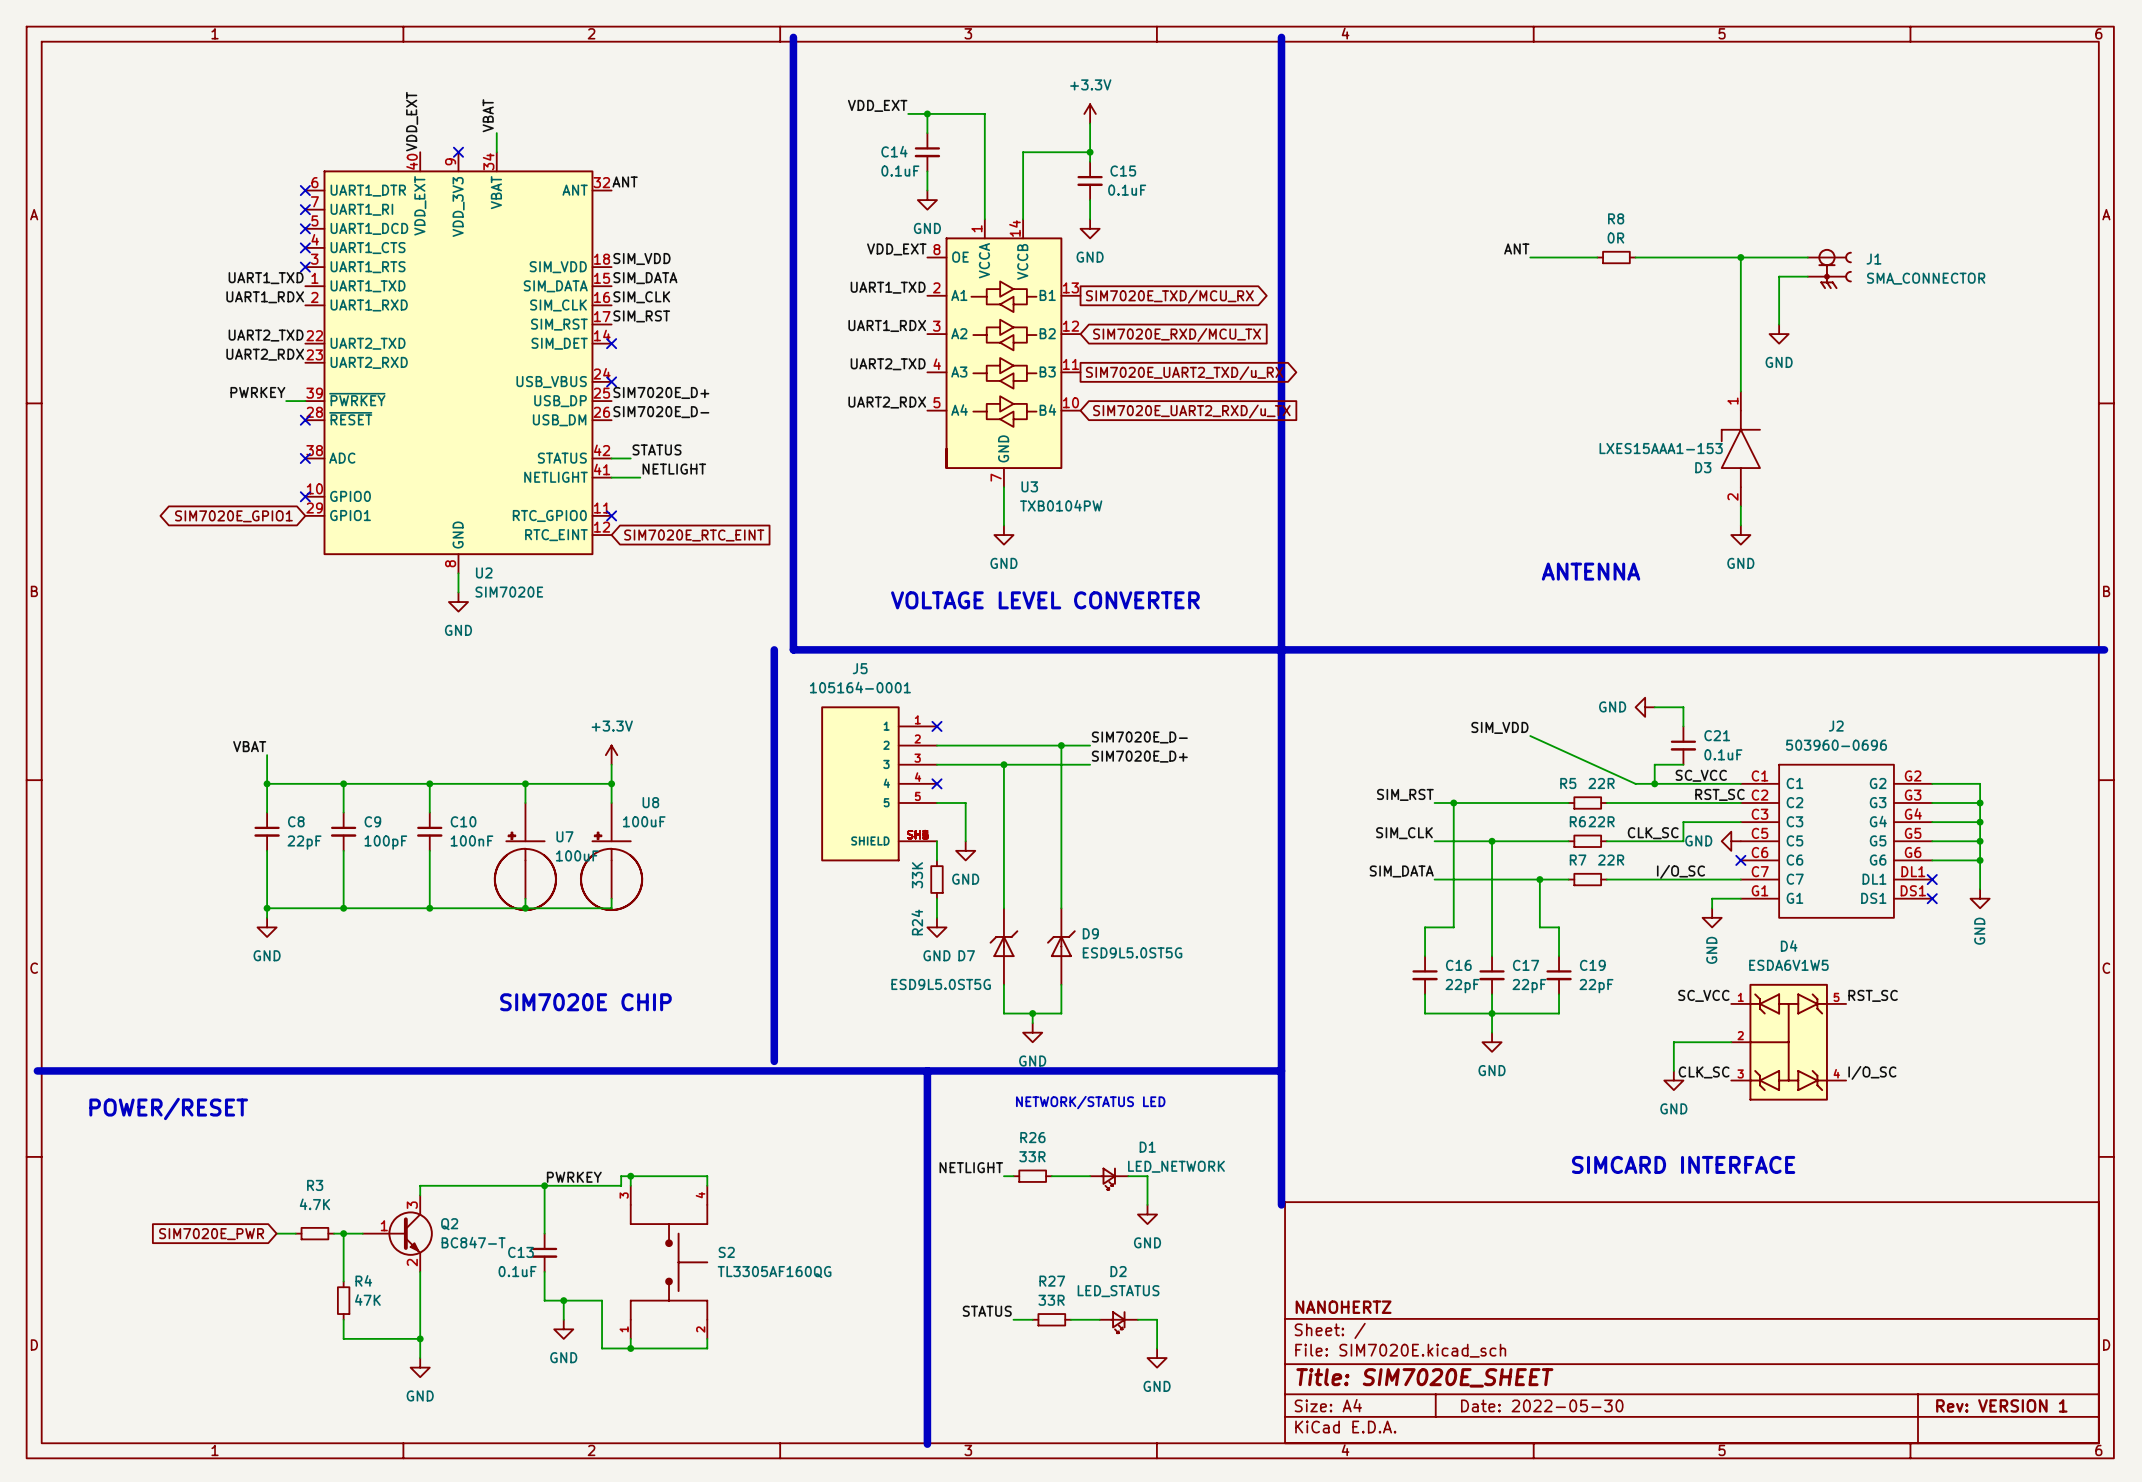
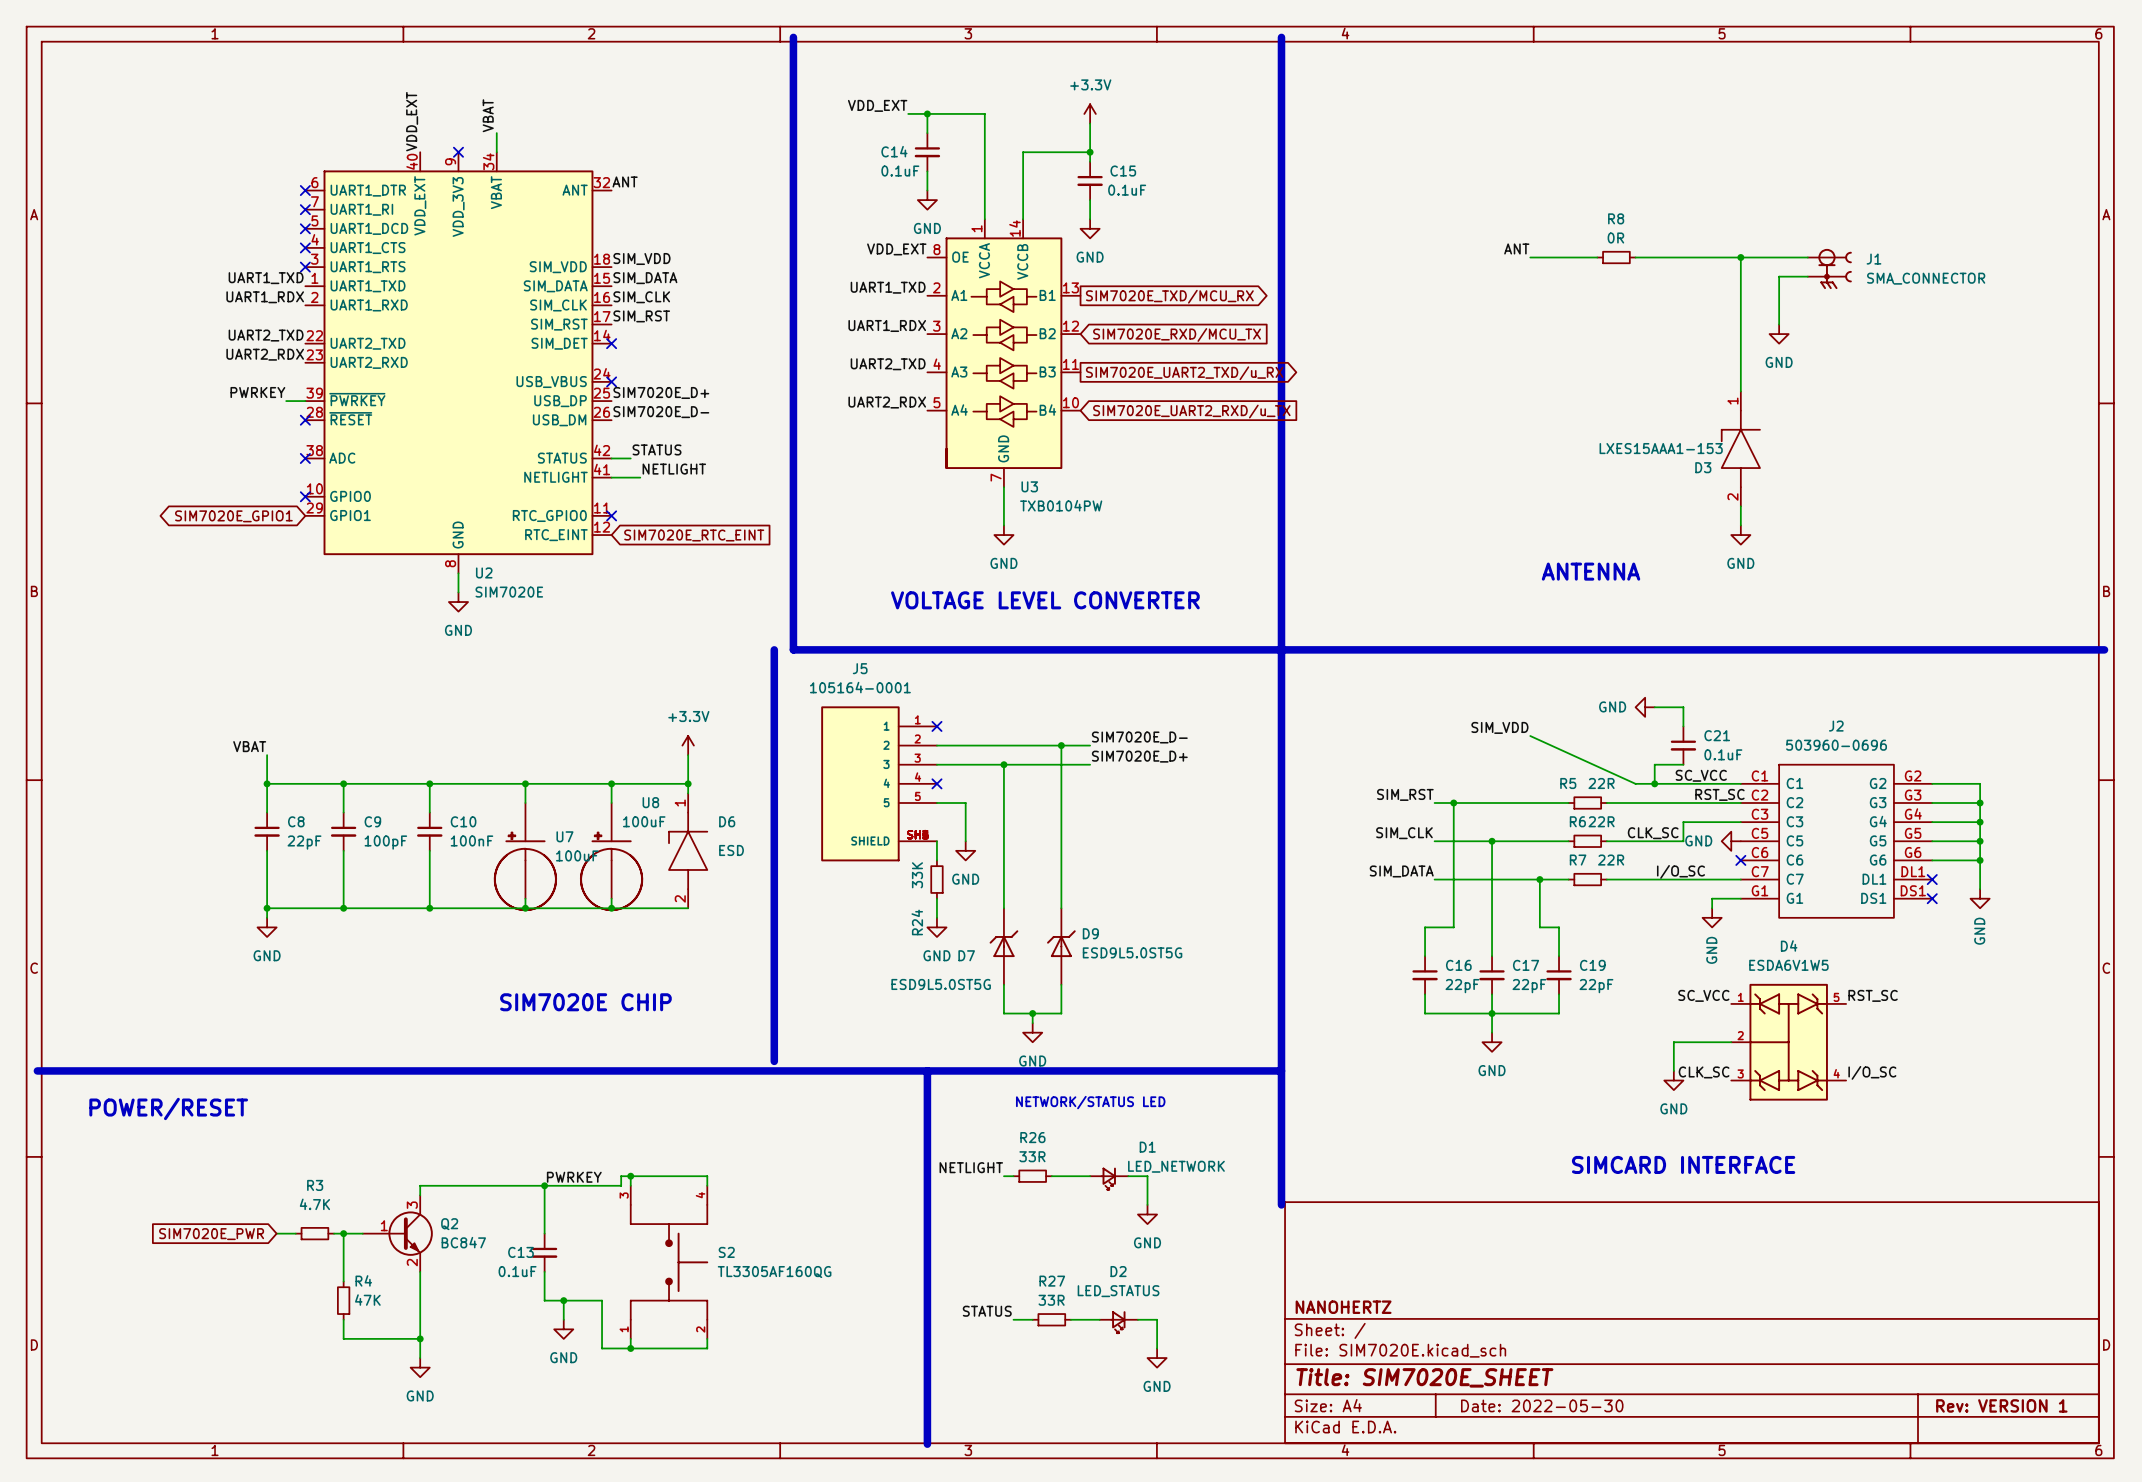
power symbol position: +3.3V (611, 755) -> +3.3V (688, 745)
wire: none -> (688, 755) (688, 793)
wire: (611, 764) (611, 783) -> (688, 783) (611, 783)
junction: none -> (688, 783)
D6: none -> ESD (688, 850)
wire: none -> (611, 908) (688, 908)
junction: none -> (611, 908)
Q2 value: BC847-T (473, 1242) -> BC847 (463, 1242)

